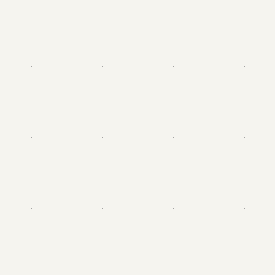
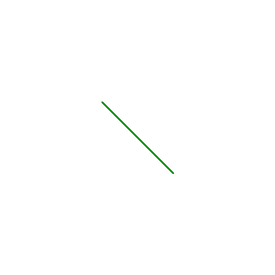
wire: none -> (102, 102) (173, 173)

